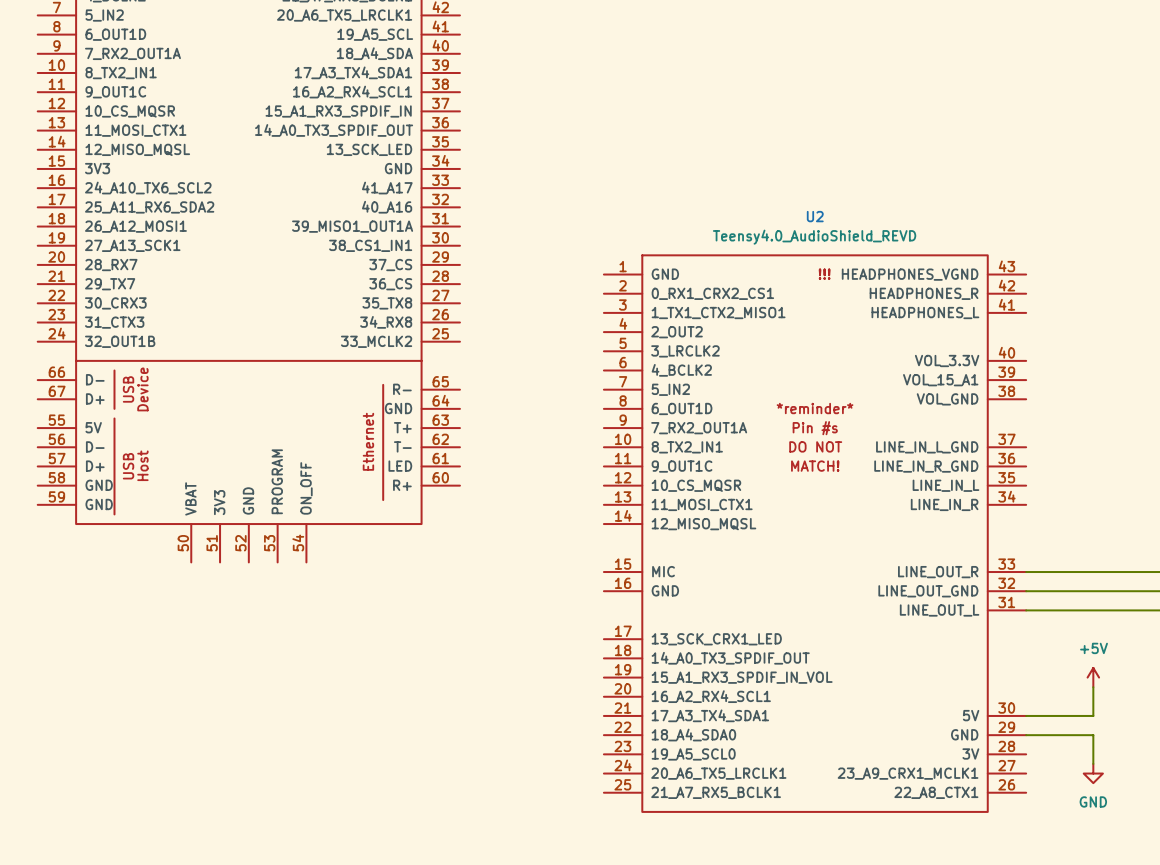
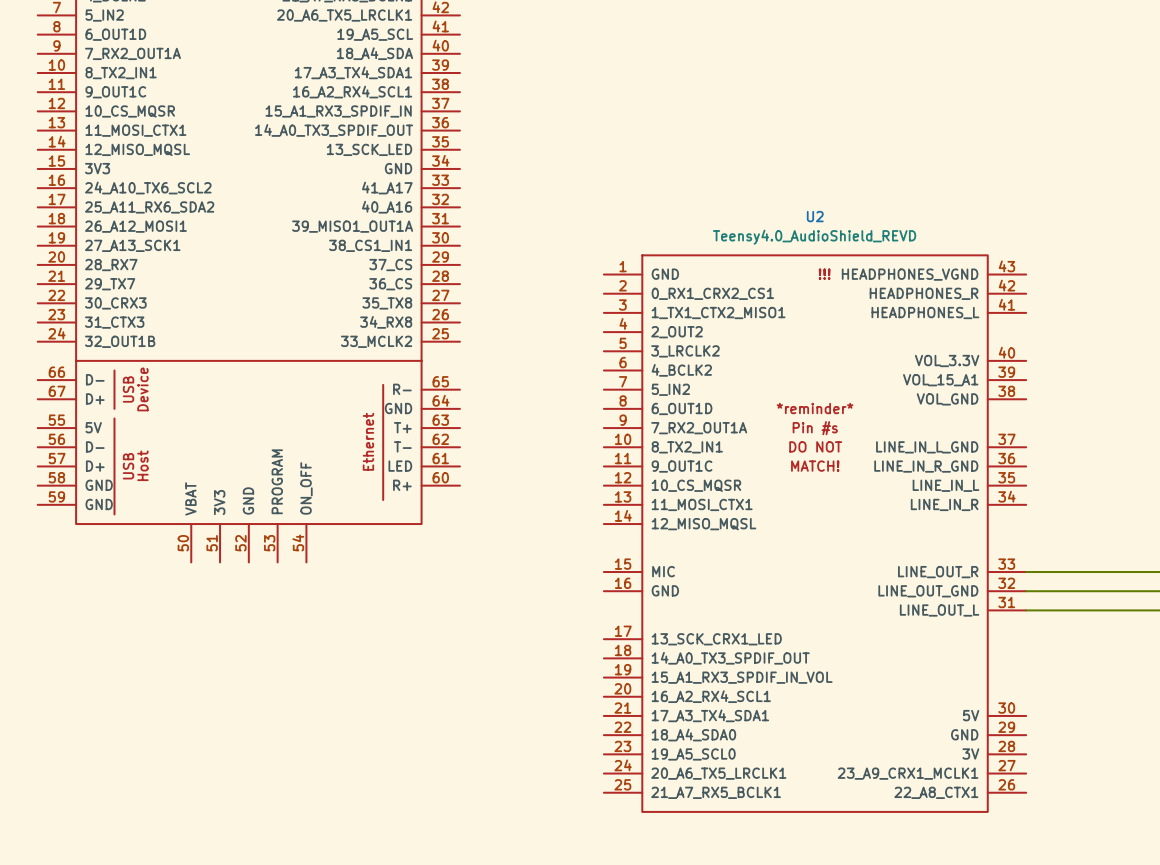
power symbol: +5V (1093, 677) -> none
wire: (1093, 687) (1093, 715) (1026, 715) -> none
wire: (1026, 735) (1093, 735) (1093, 763) -> none
power symbol: GND (1093, 773) -> none

